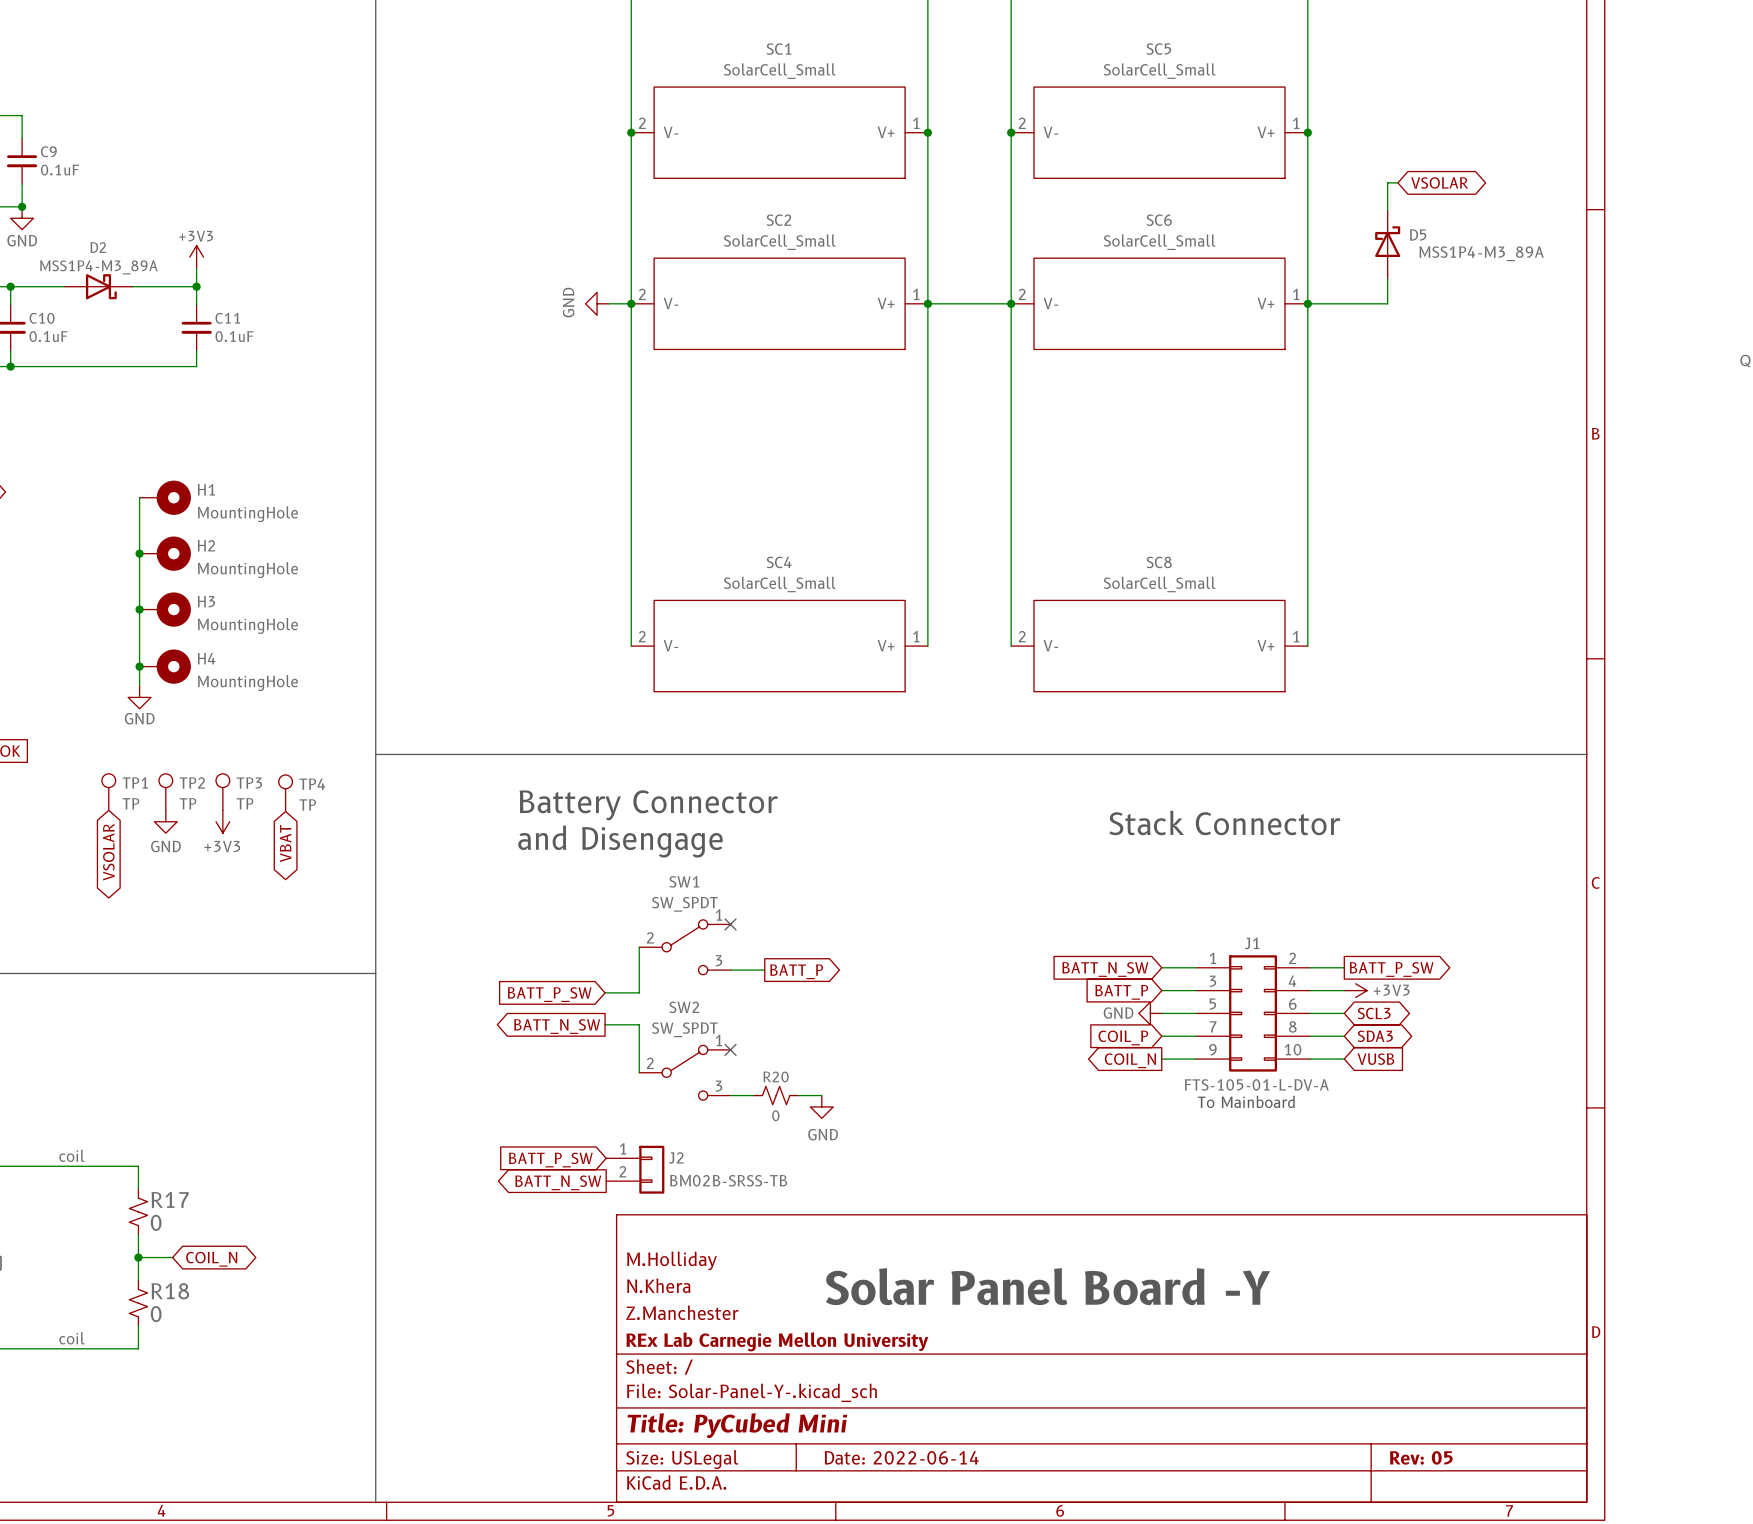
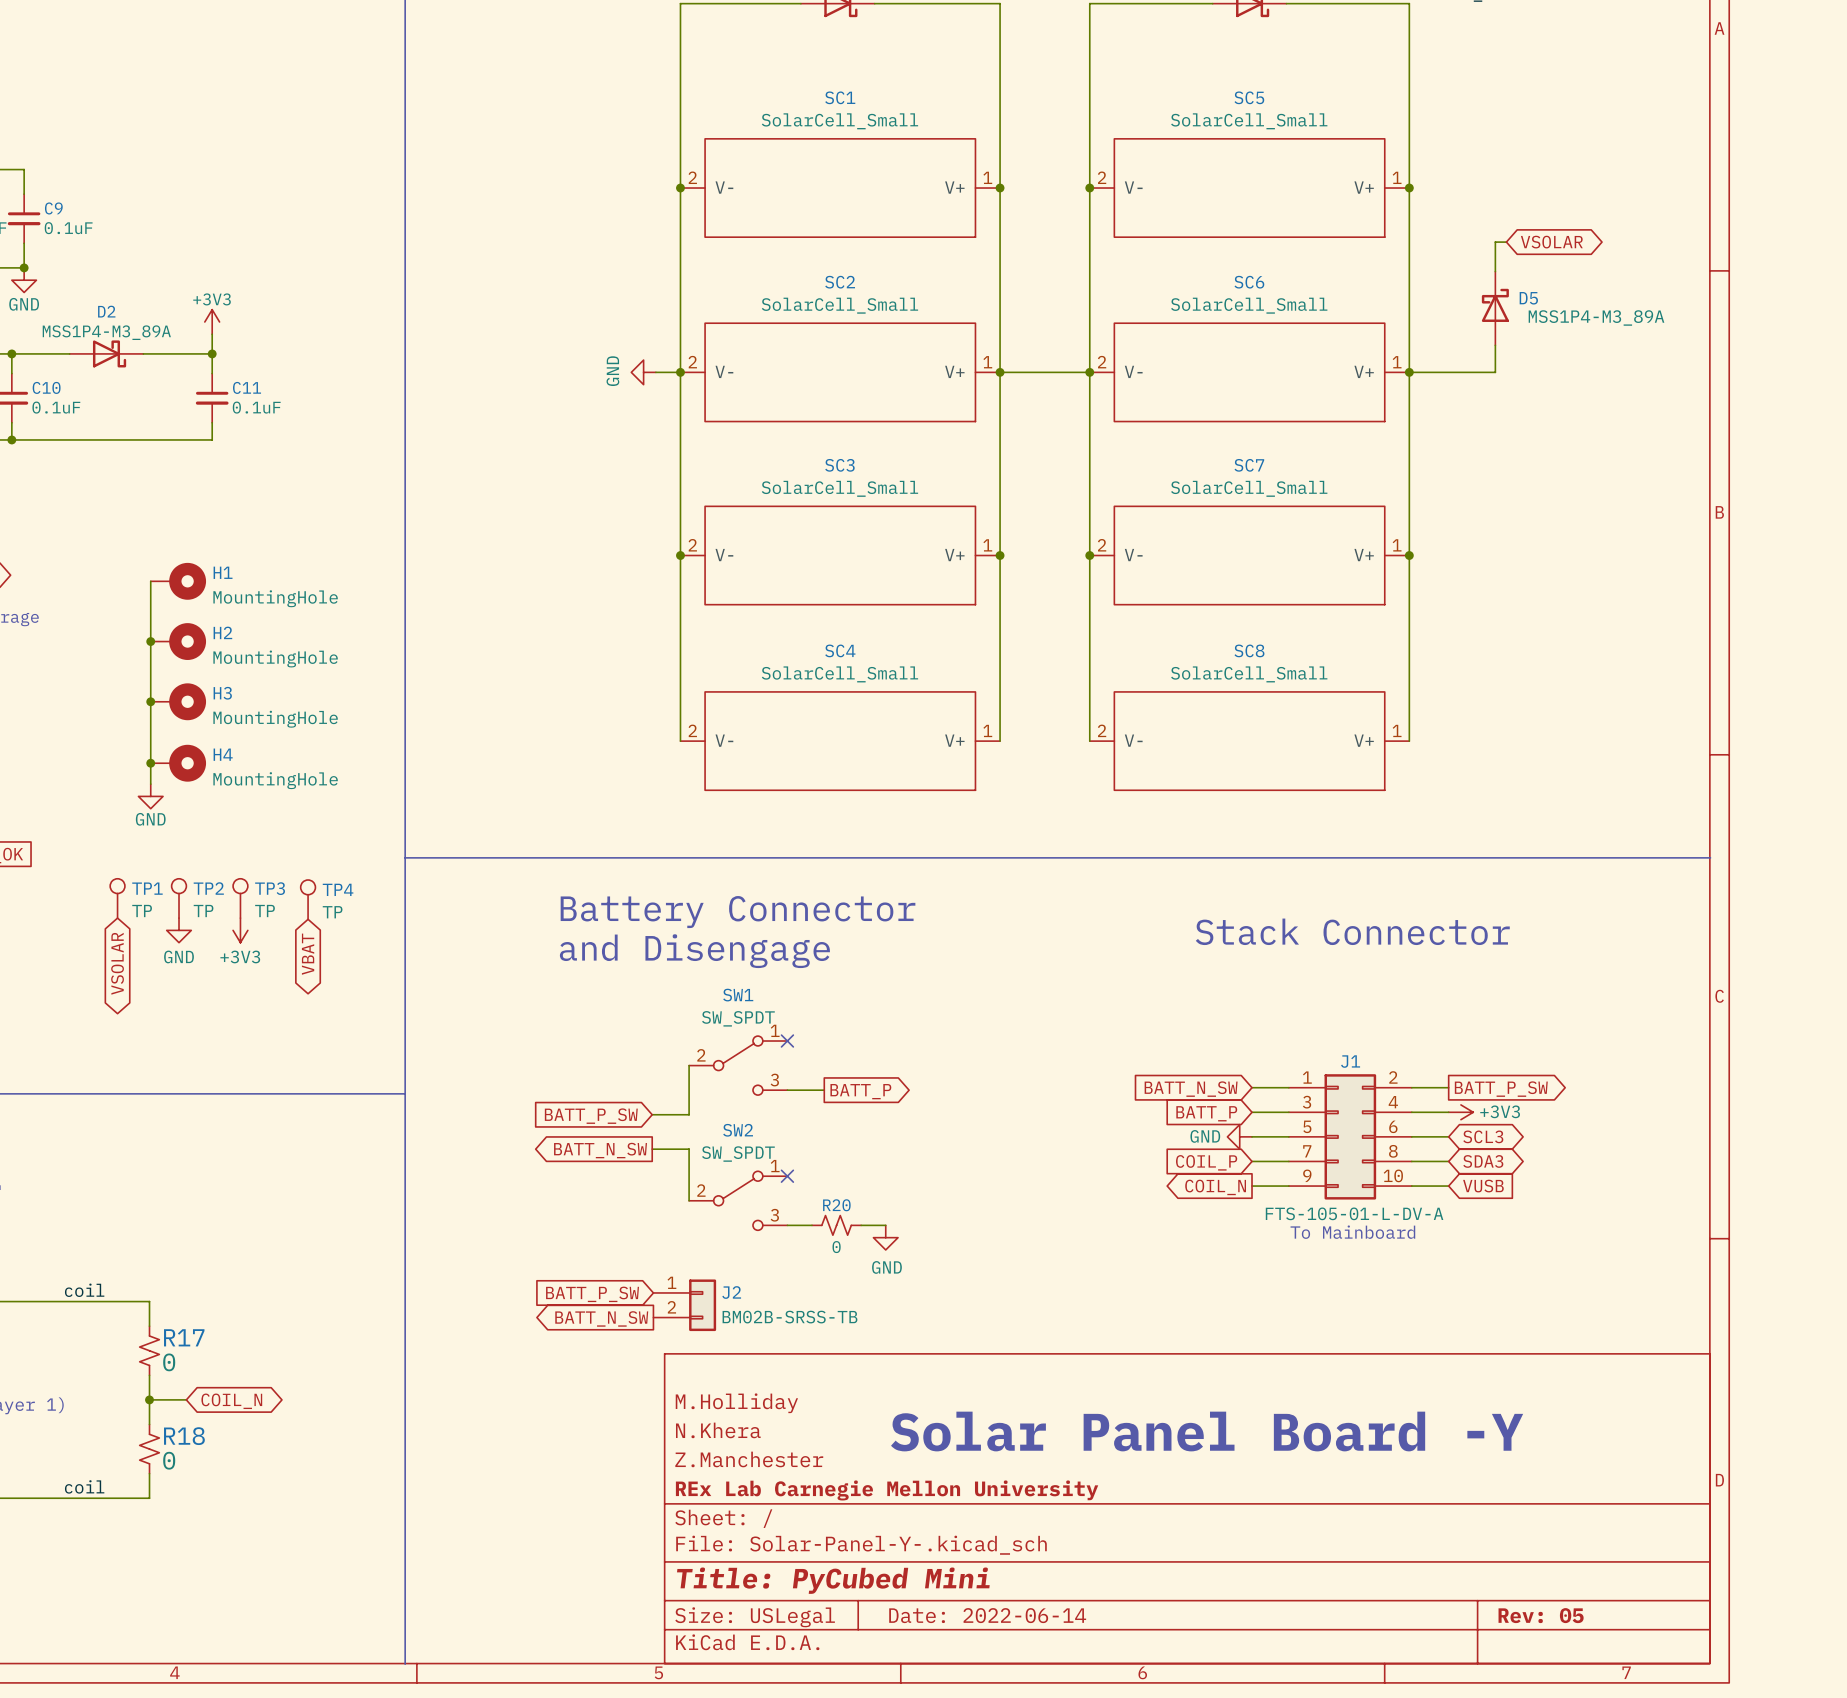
junction: none -> (680, 555)
SC3: none -> SolarCell_Small (840, 555)
junction: none -> (1000, 555)
junction: none -> (1089, 555)
SC7: none -> SolarCell_Small (1249, 555)
junction: none -> (1409, 555)

